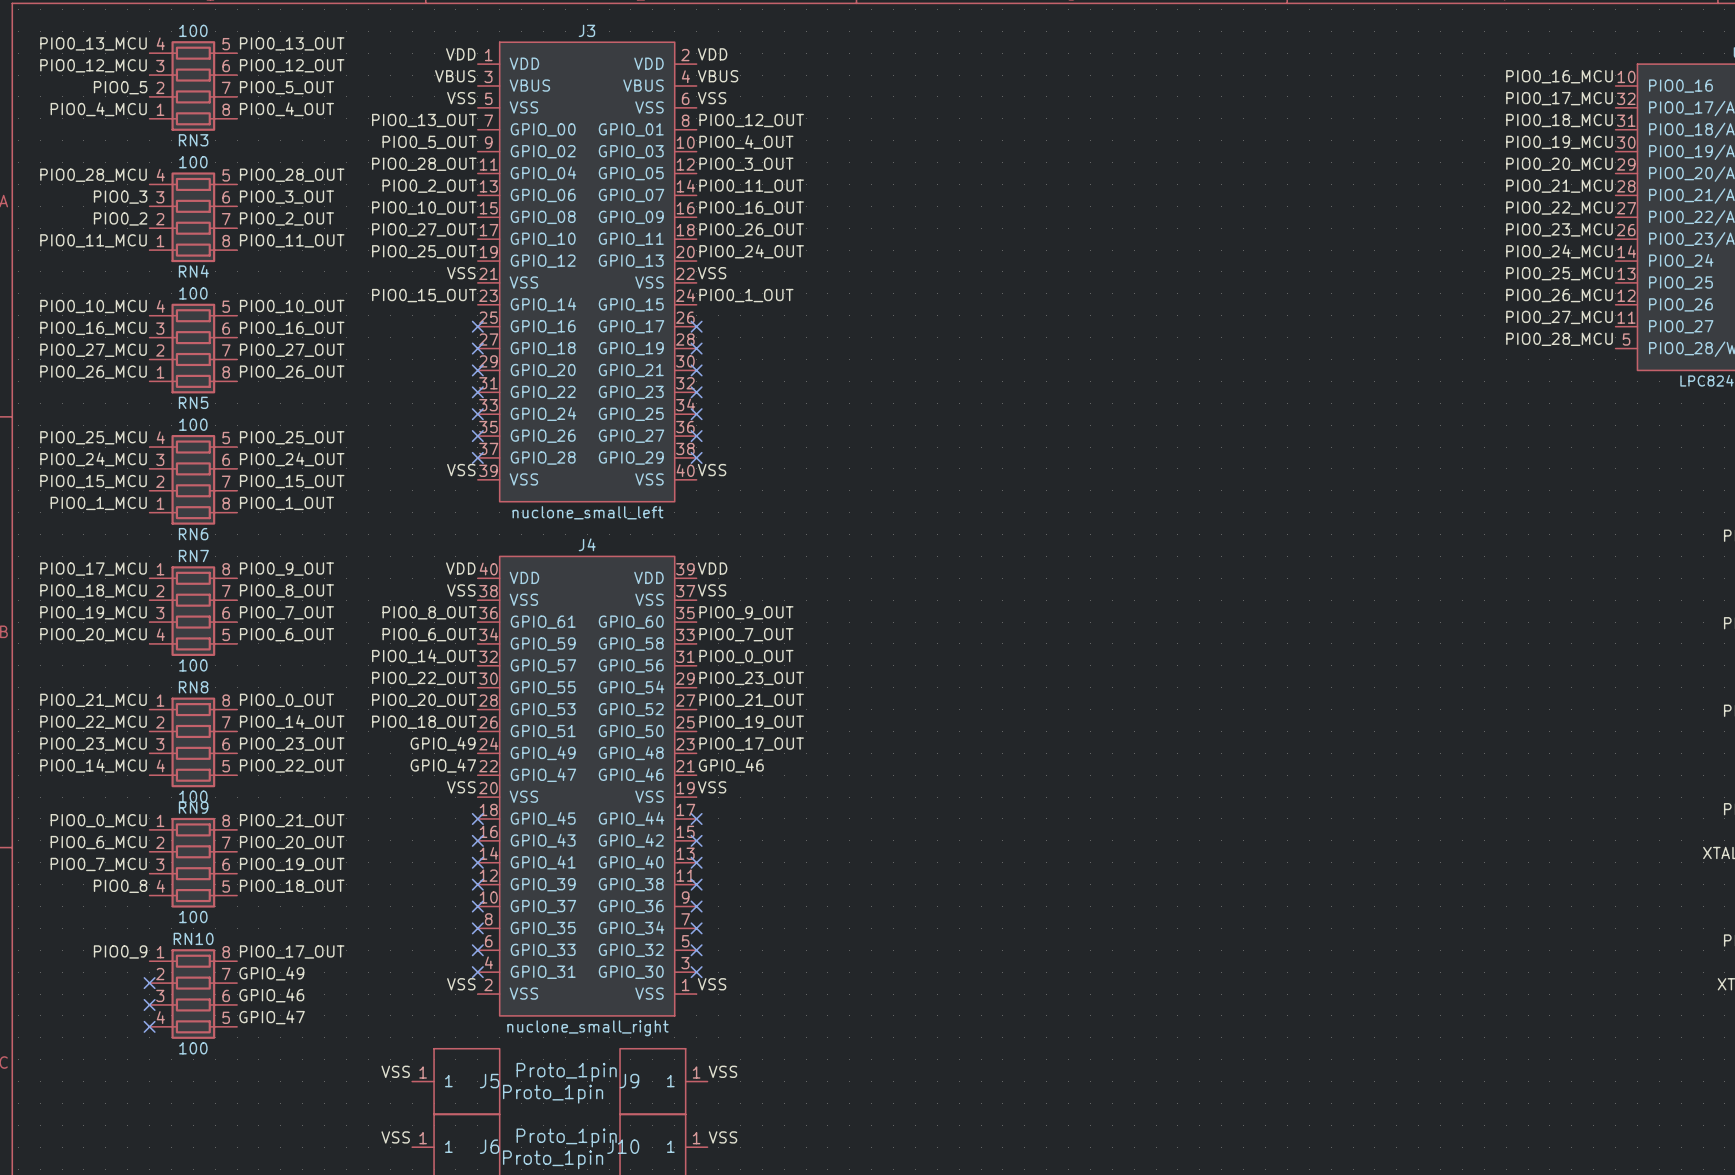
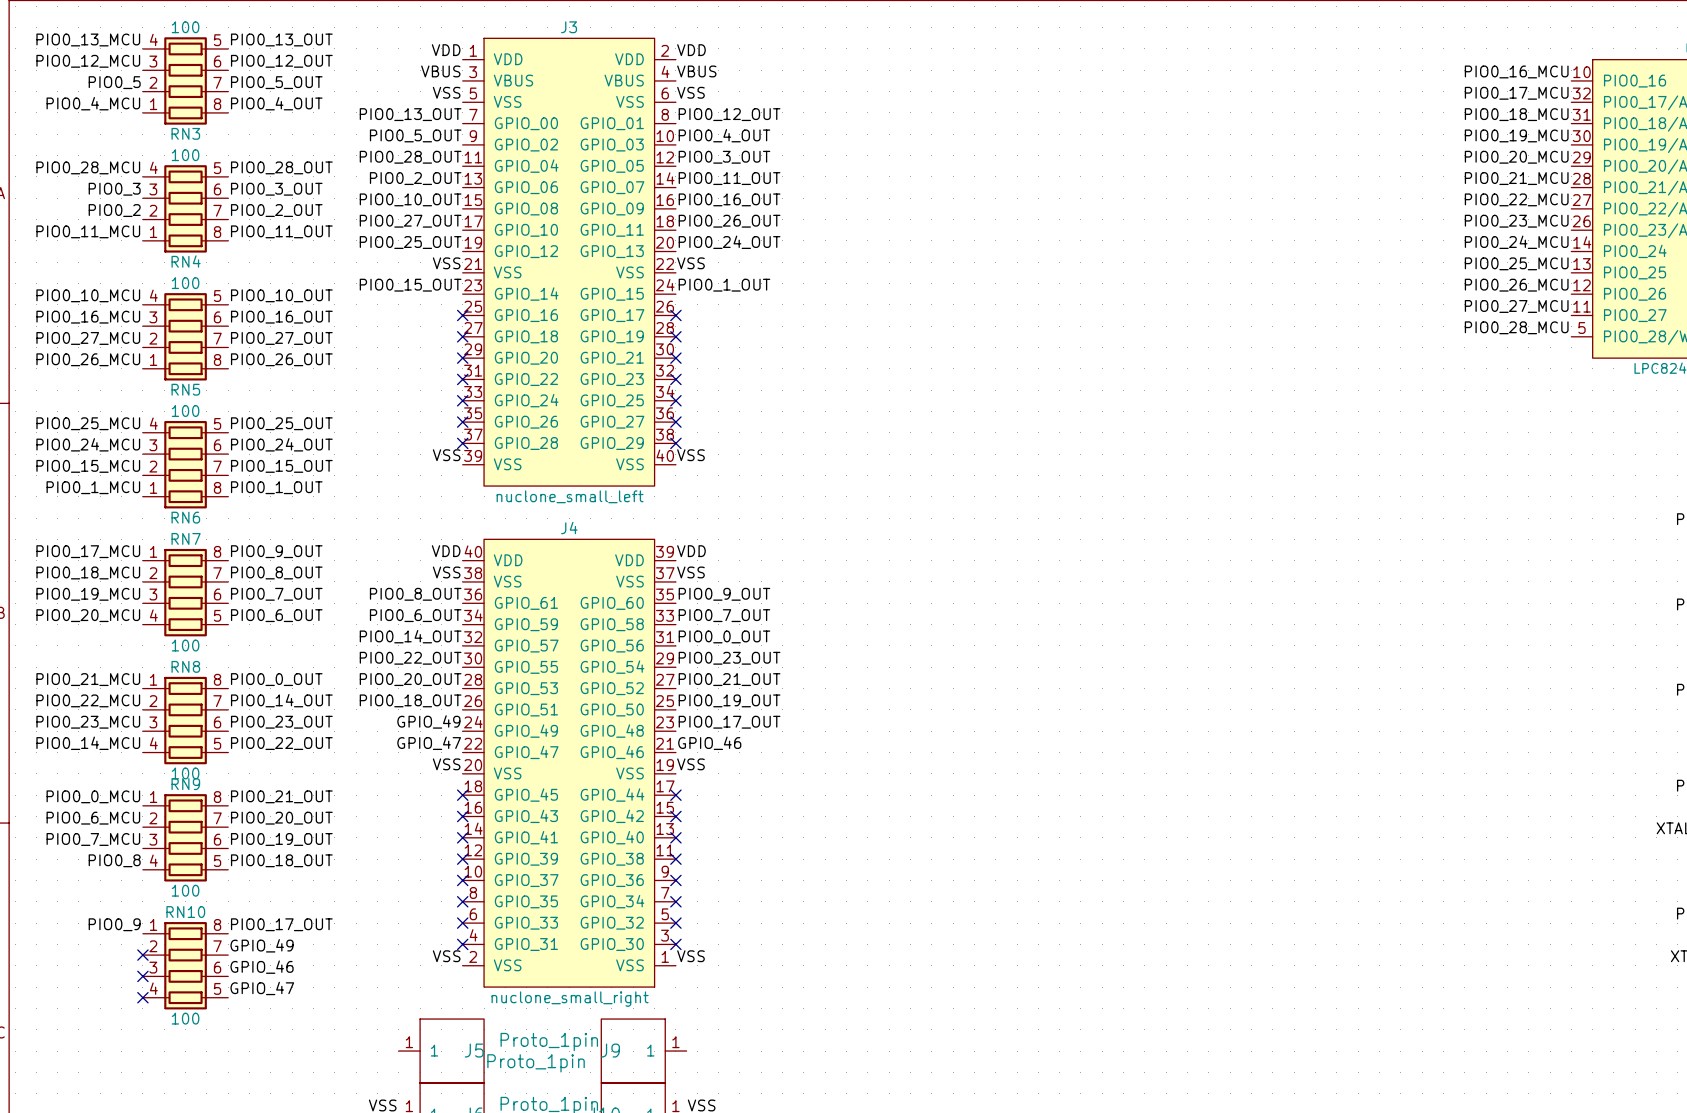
label: VSS (395, 1071) -> none
label: VSS (722, 1071) -> none

